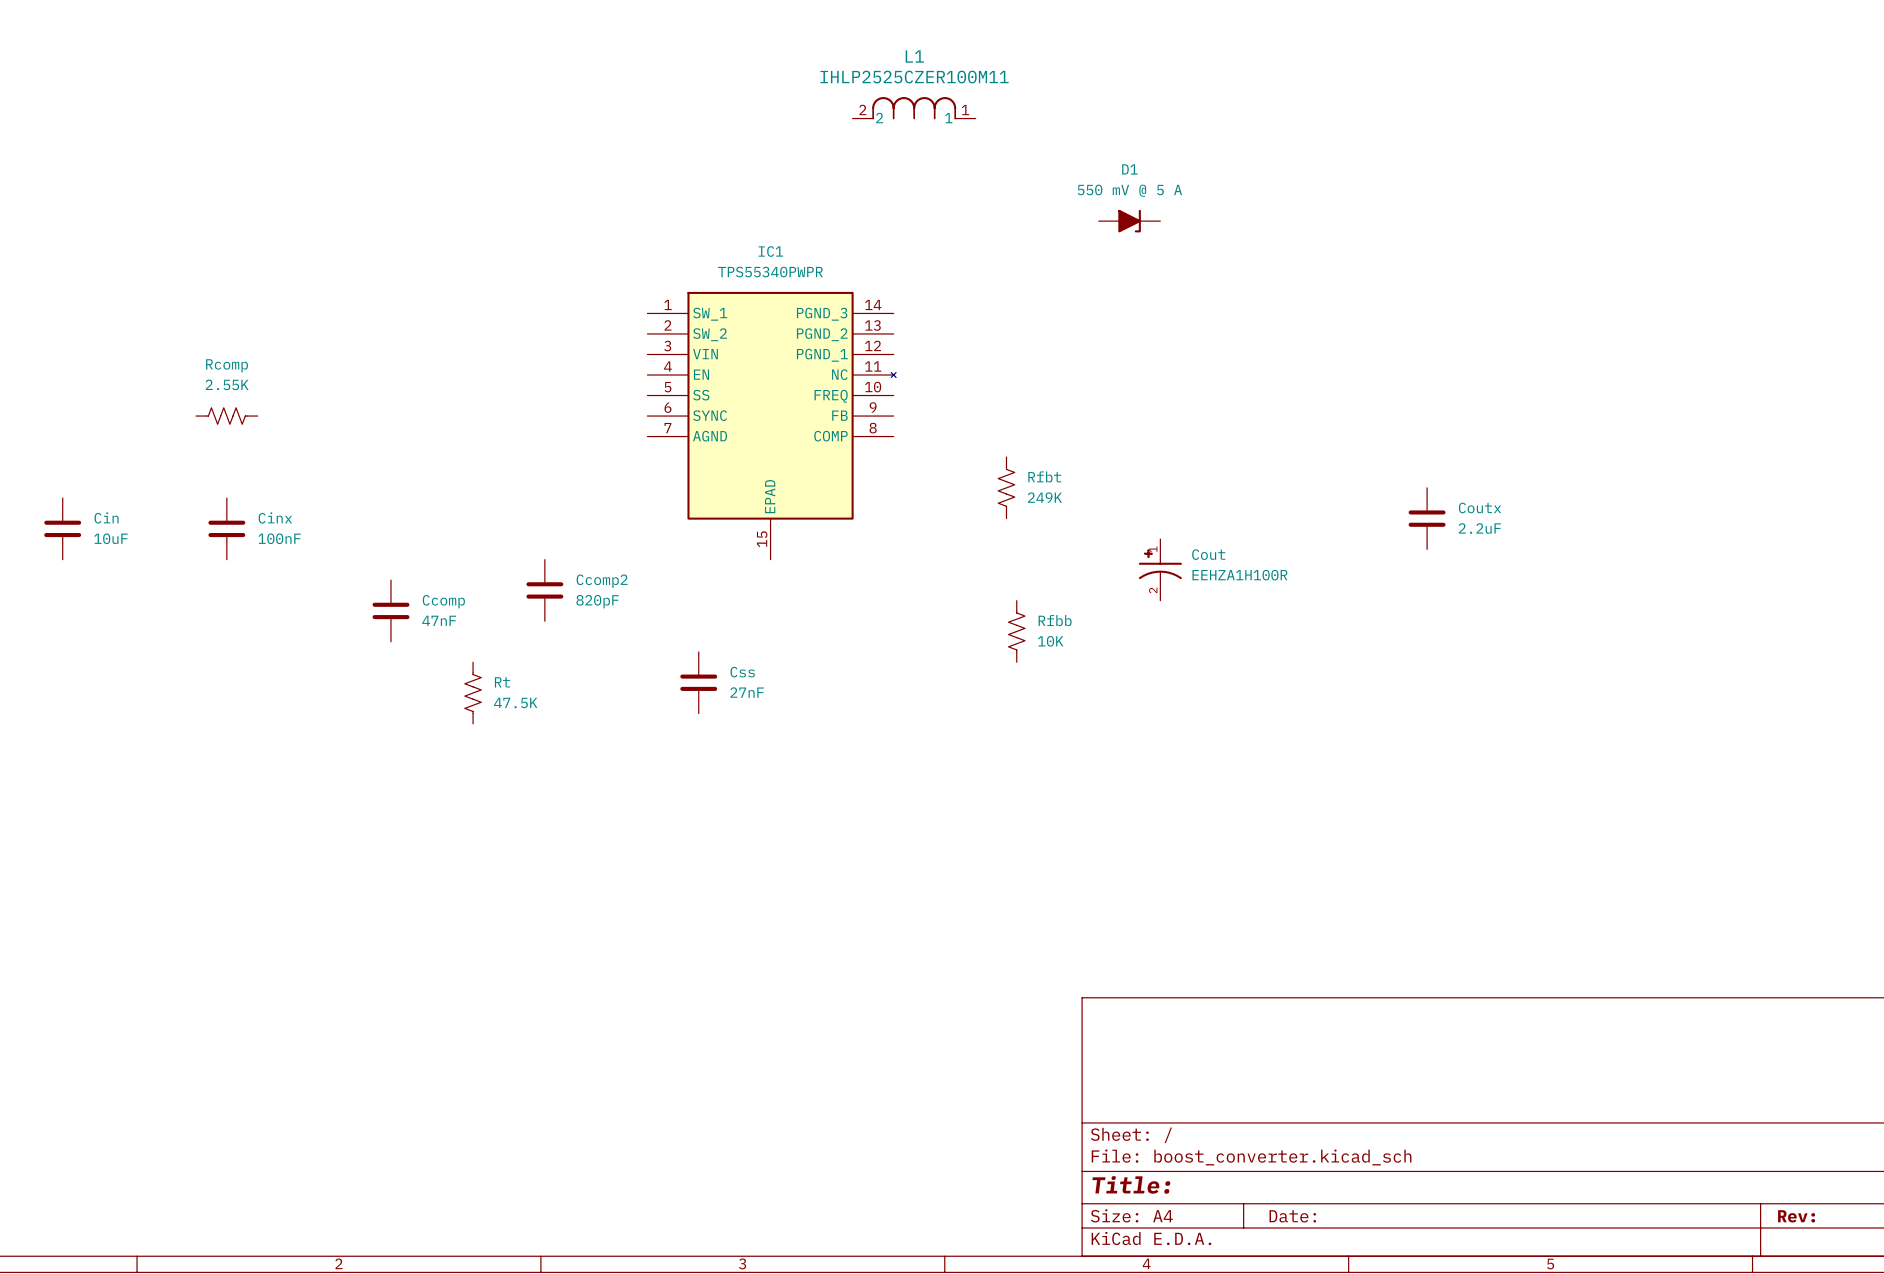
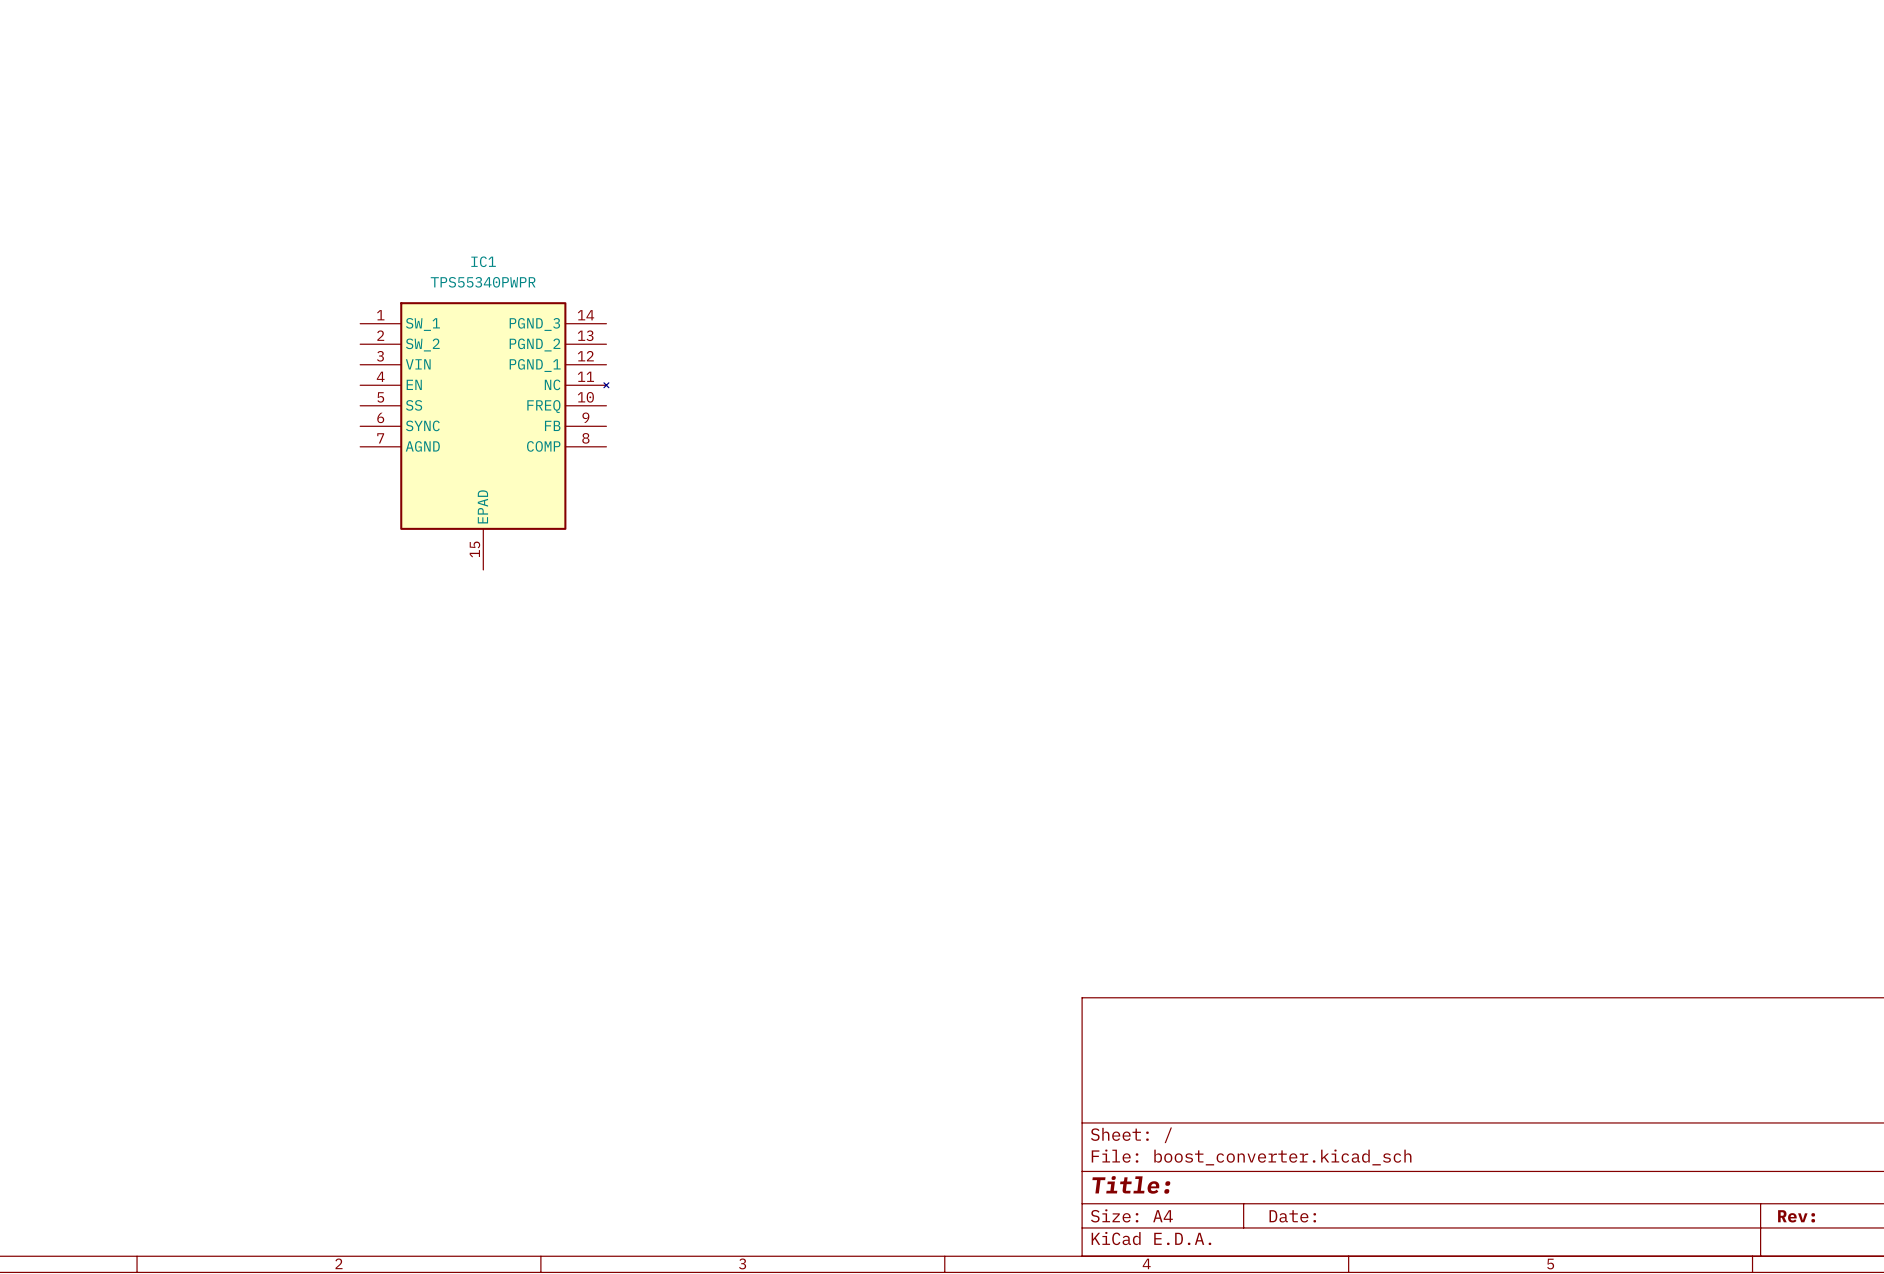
L1: IHLP2525CZER100M11 (914, 108) -> none
D1: 550 mV @ 5 A (1129, 221) -> none
Rcomp: 2.55K (226, 416) -> none
IC1 position: (771, 425) -> (484, 436)
Rfbt: 249K (1006, 487) -> none
Coutx: 2.2uF (1427, 518) -> none
Cin: 10uF (62, 528) -> none
Cinx: 100nF (226, 528) -> none
Cout: EEHZA1H100R (1160, 569) -> none
Ccomp2: 820pF (544, 590) -> none
Ccomp: 47nF (390, 610) -> none
Rfbb: 10K (1016, 631) -> none
Css: 27nF (698, 682) -> none
Rt: 47.5K (473, 693) -> none

